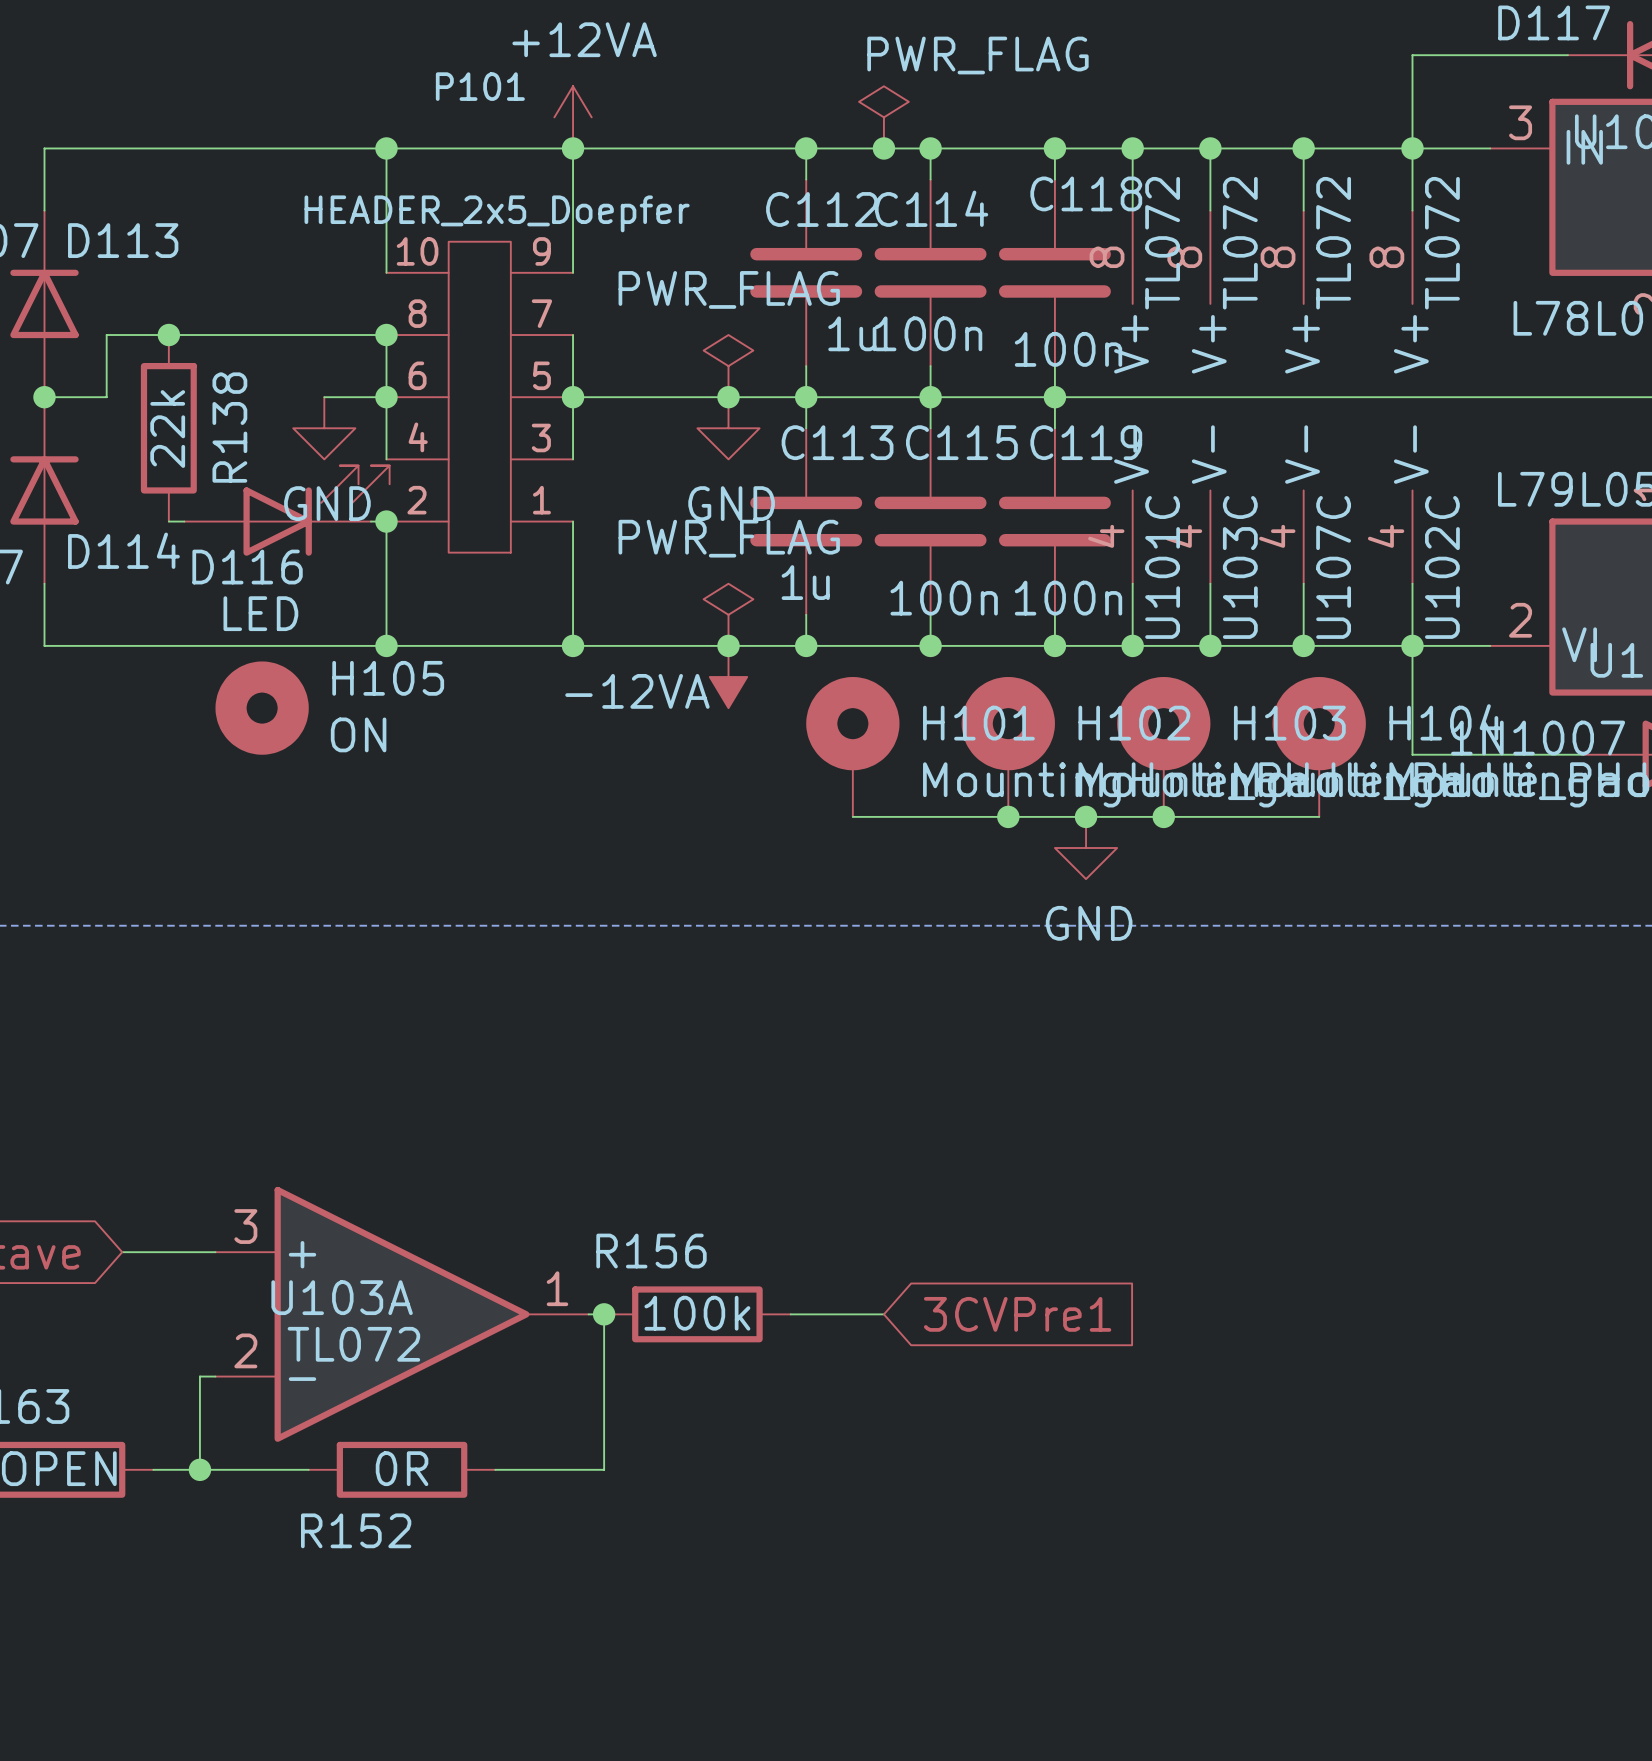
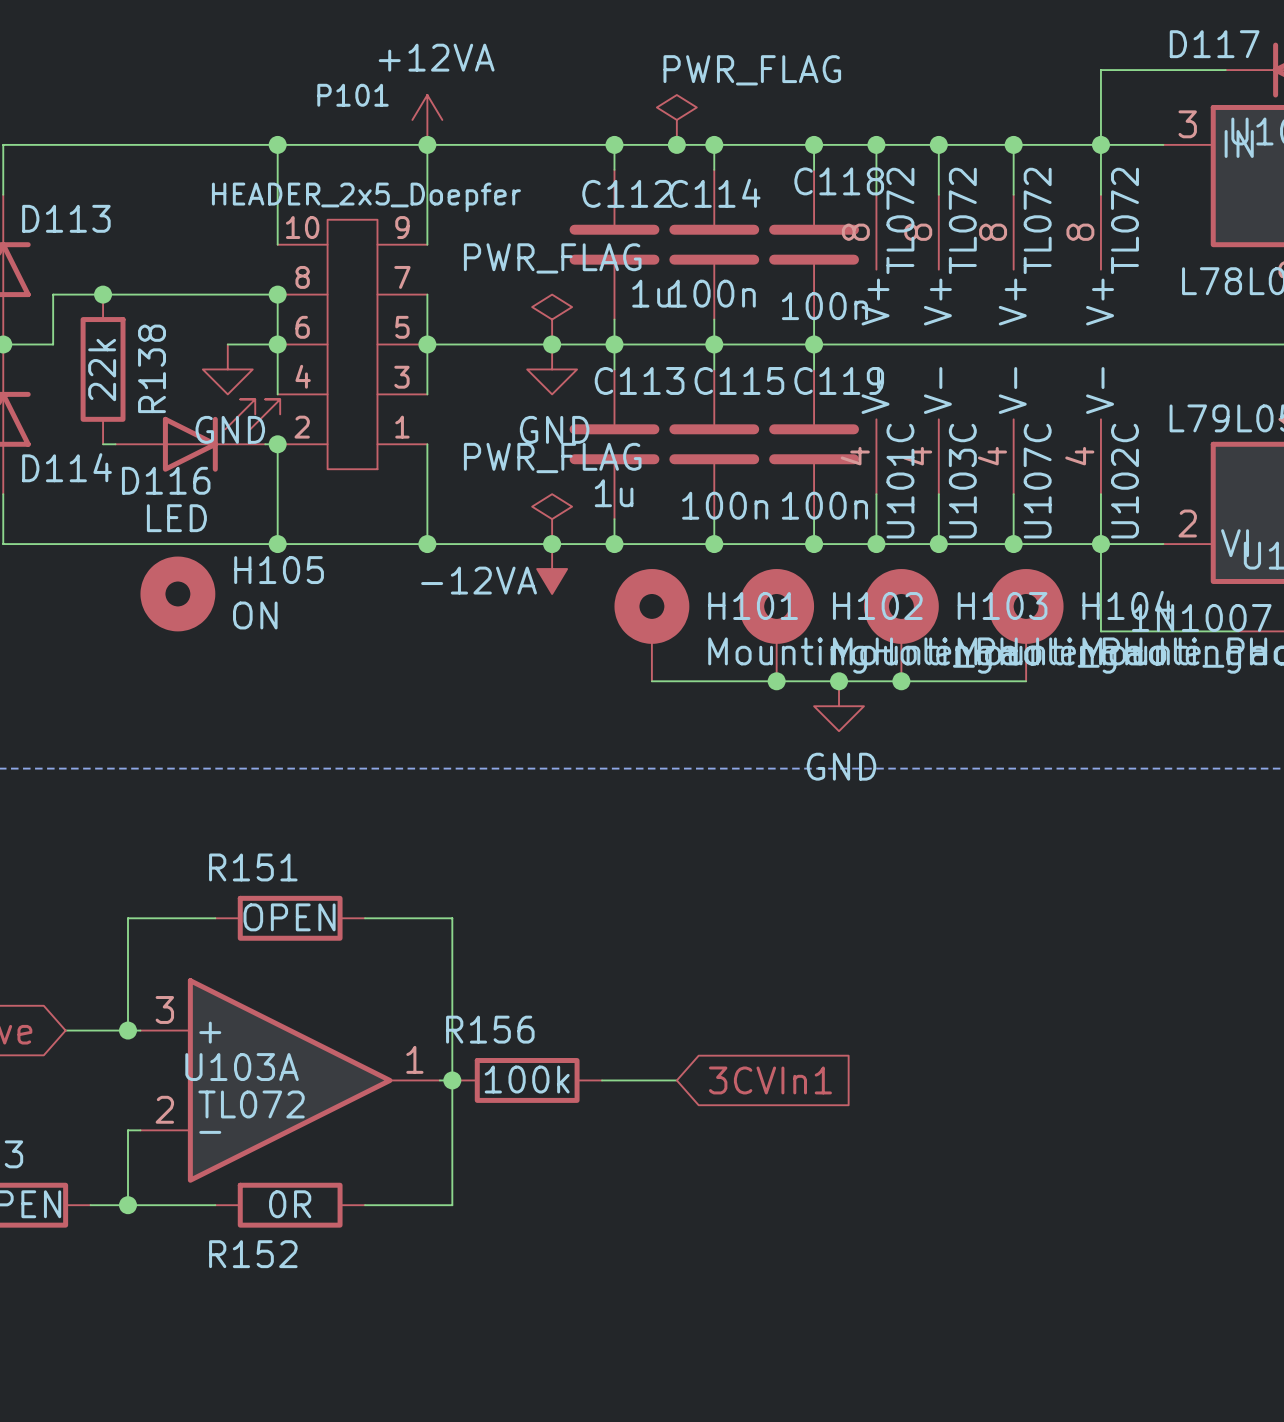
wire: none -> (215, 918) (128, 918) (128, 1030)
R151: none -> OPEN (290, 918)
wire: none -> (365, 918) (452, 918) (452, 1080)
junction: none -> (128, 1030)
global label: 3CVPre1 (1017, 1314) -> 3CVIn1 (770, 1080)

